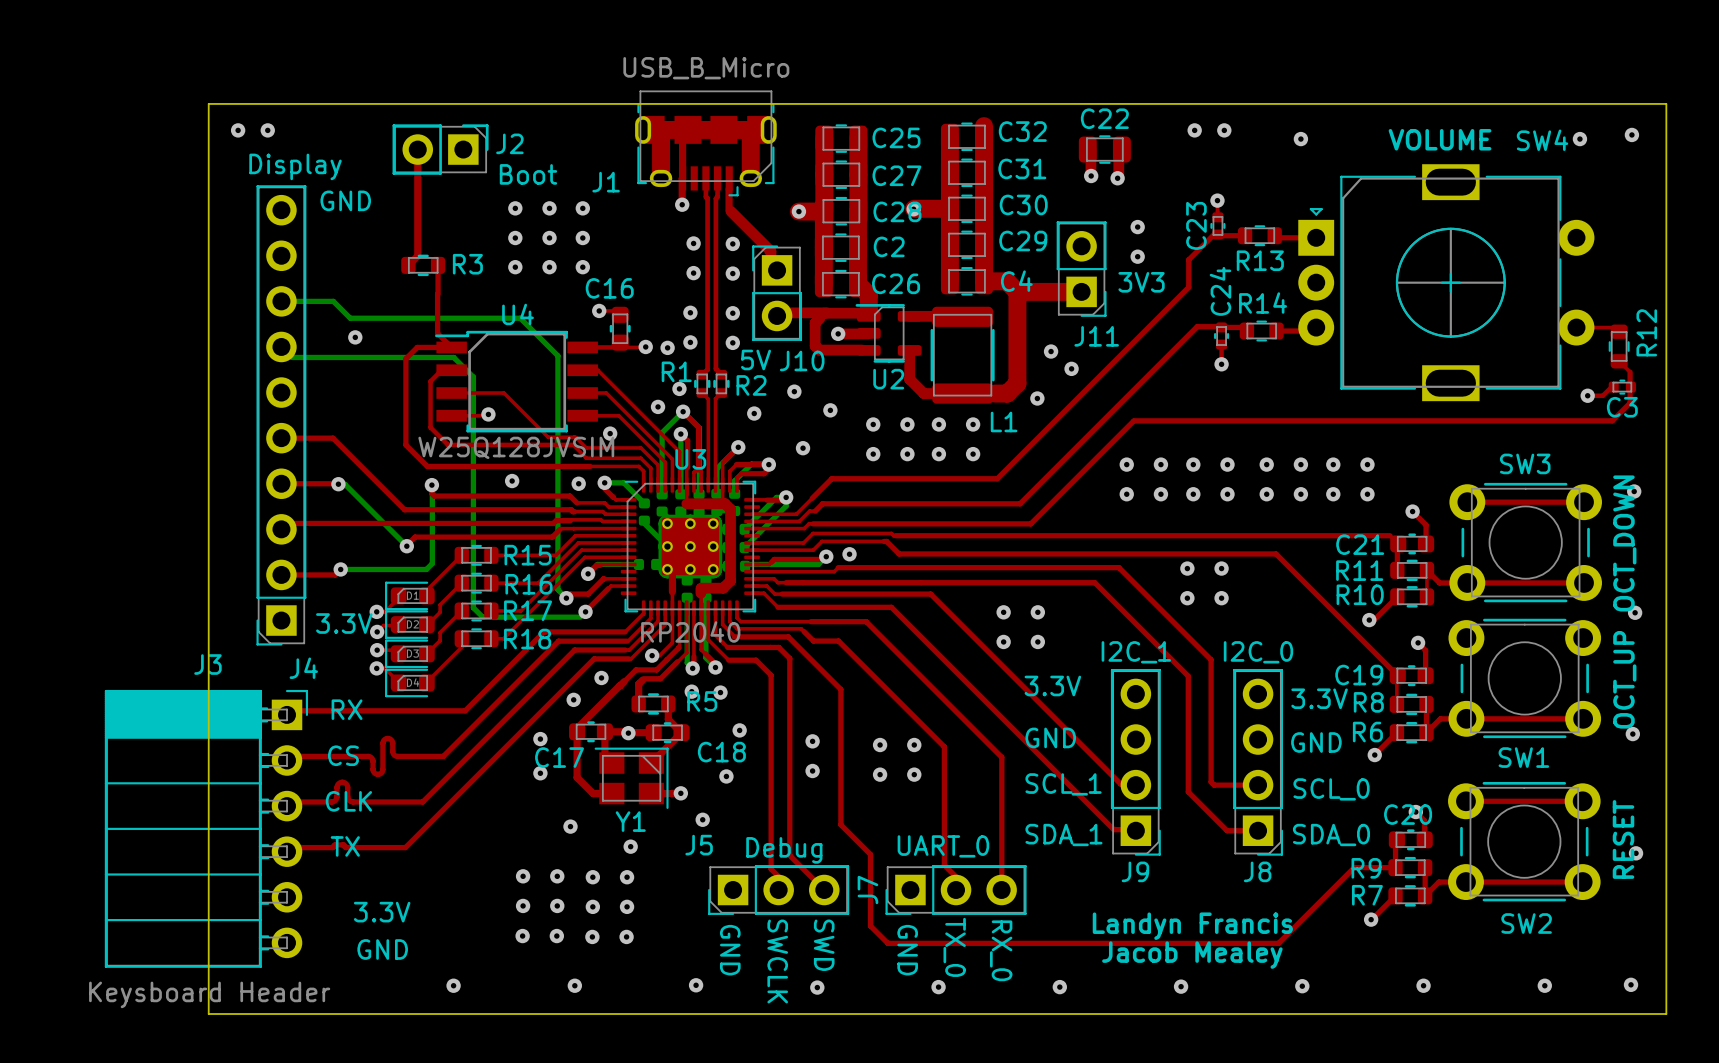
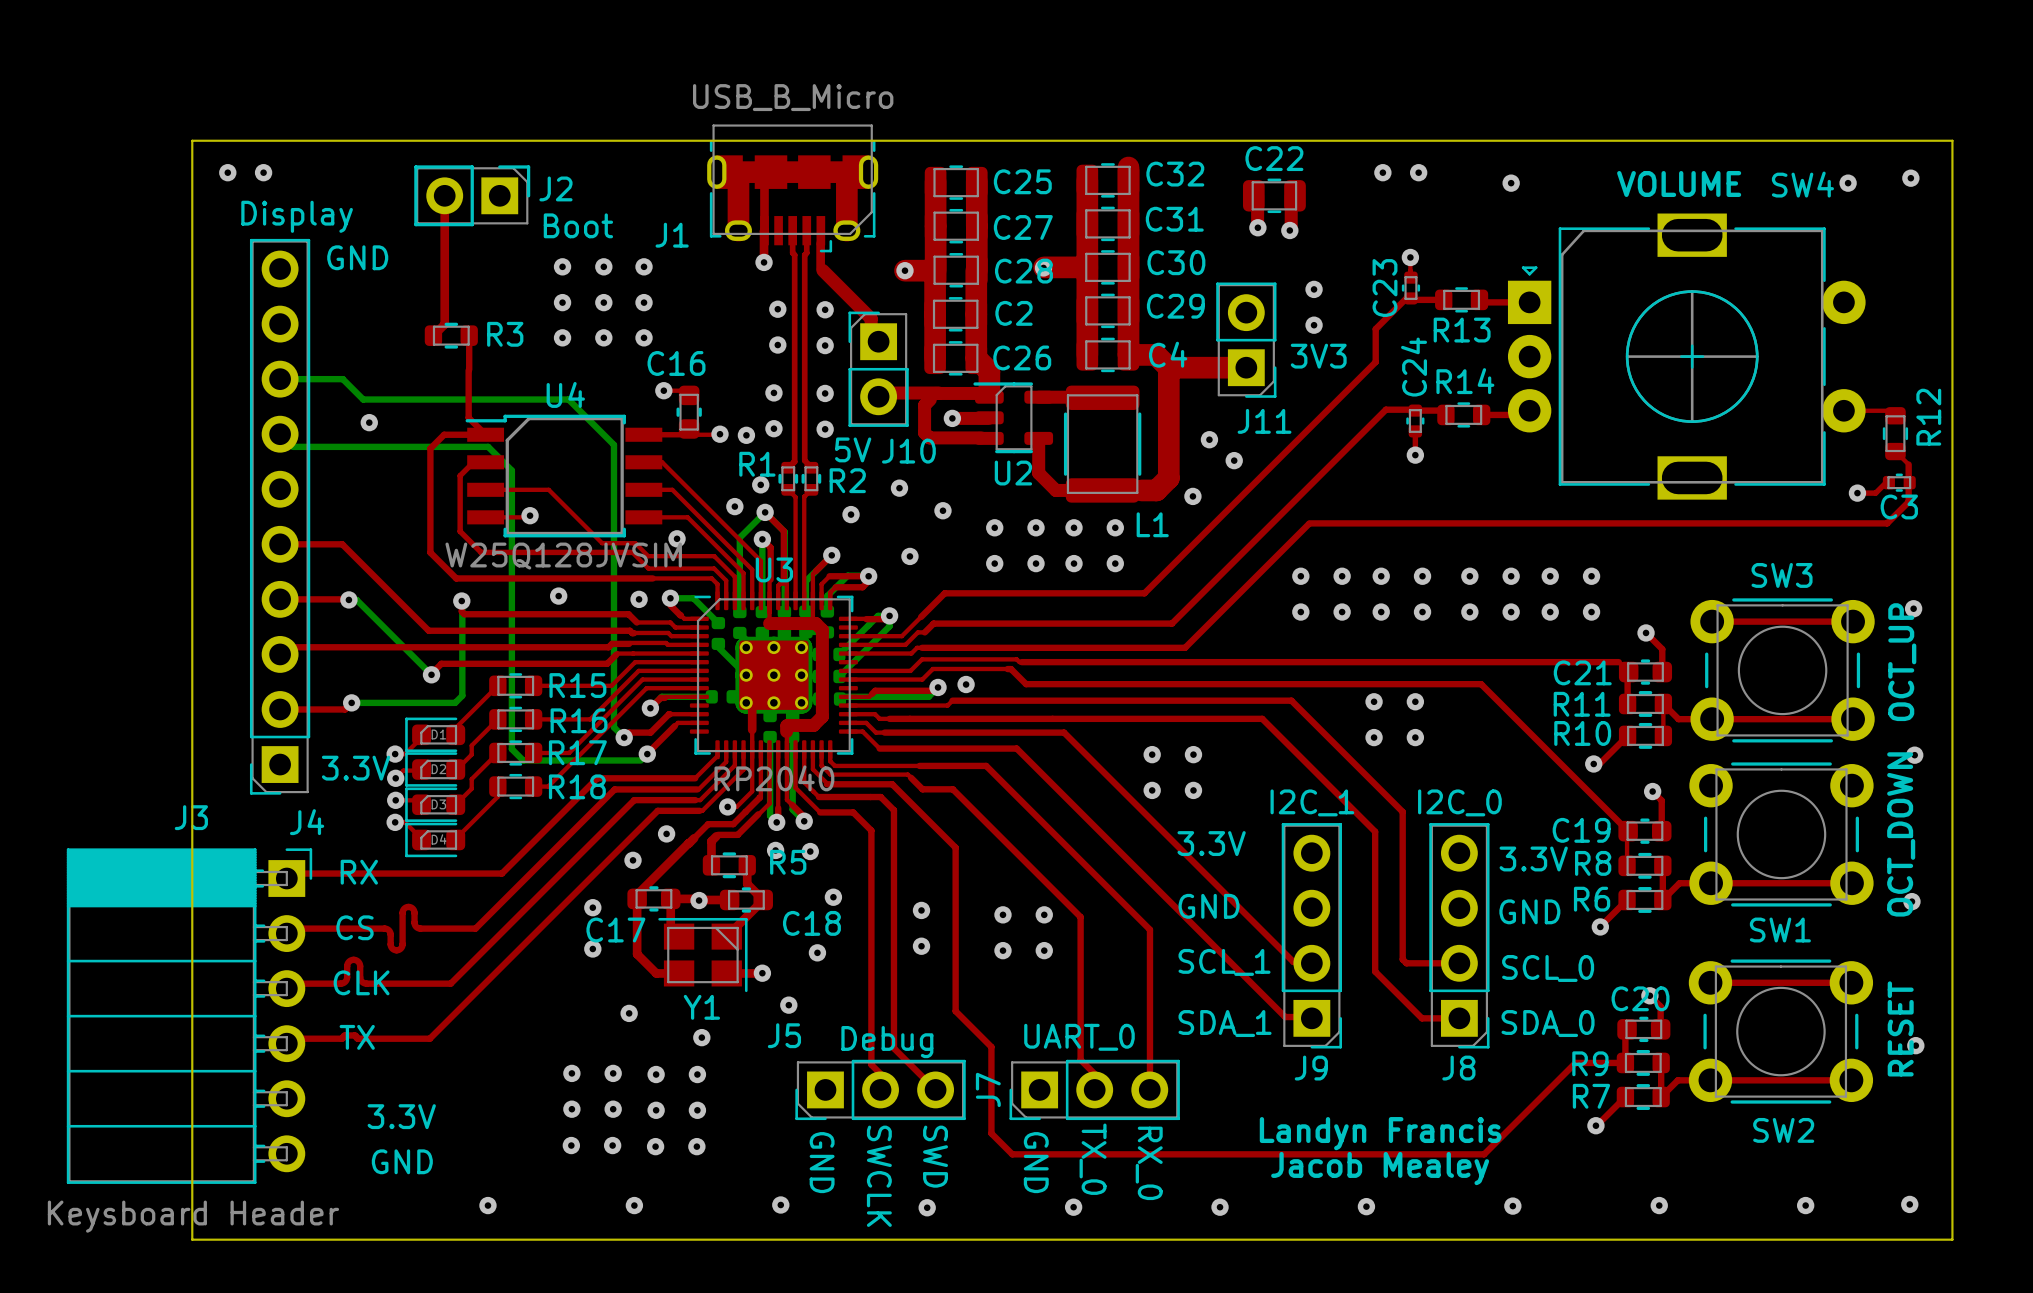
text position: OCT_DOWN (1624, 543) -> OCT_DOWN (1901, 834)
text position: OCT_UP (1624, 679) -> OCT_UP (1902, 662)

